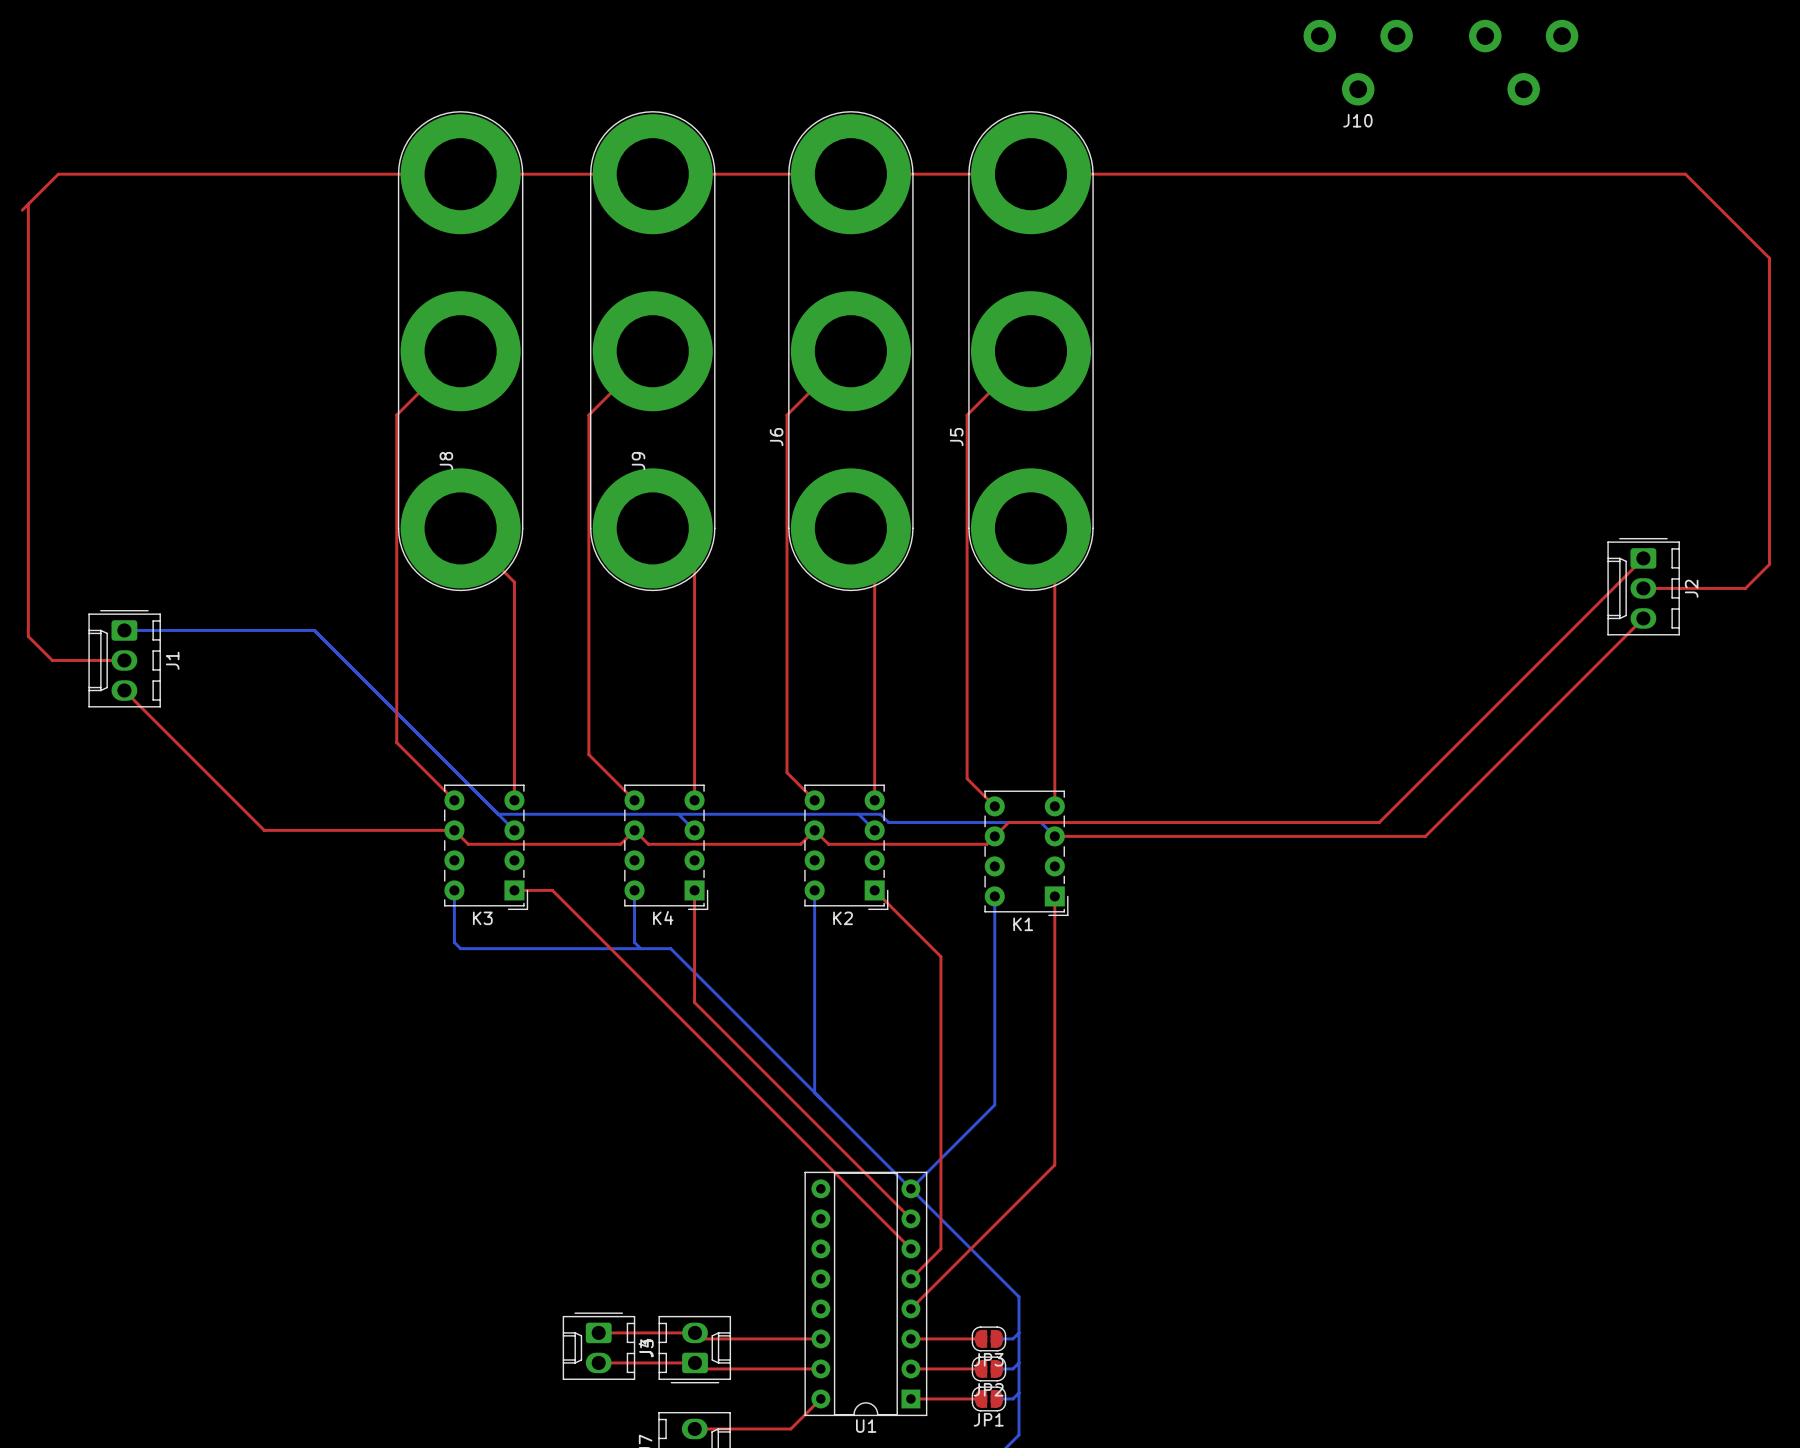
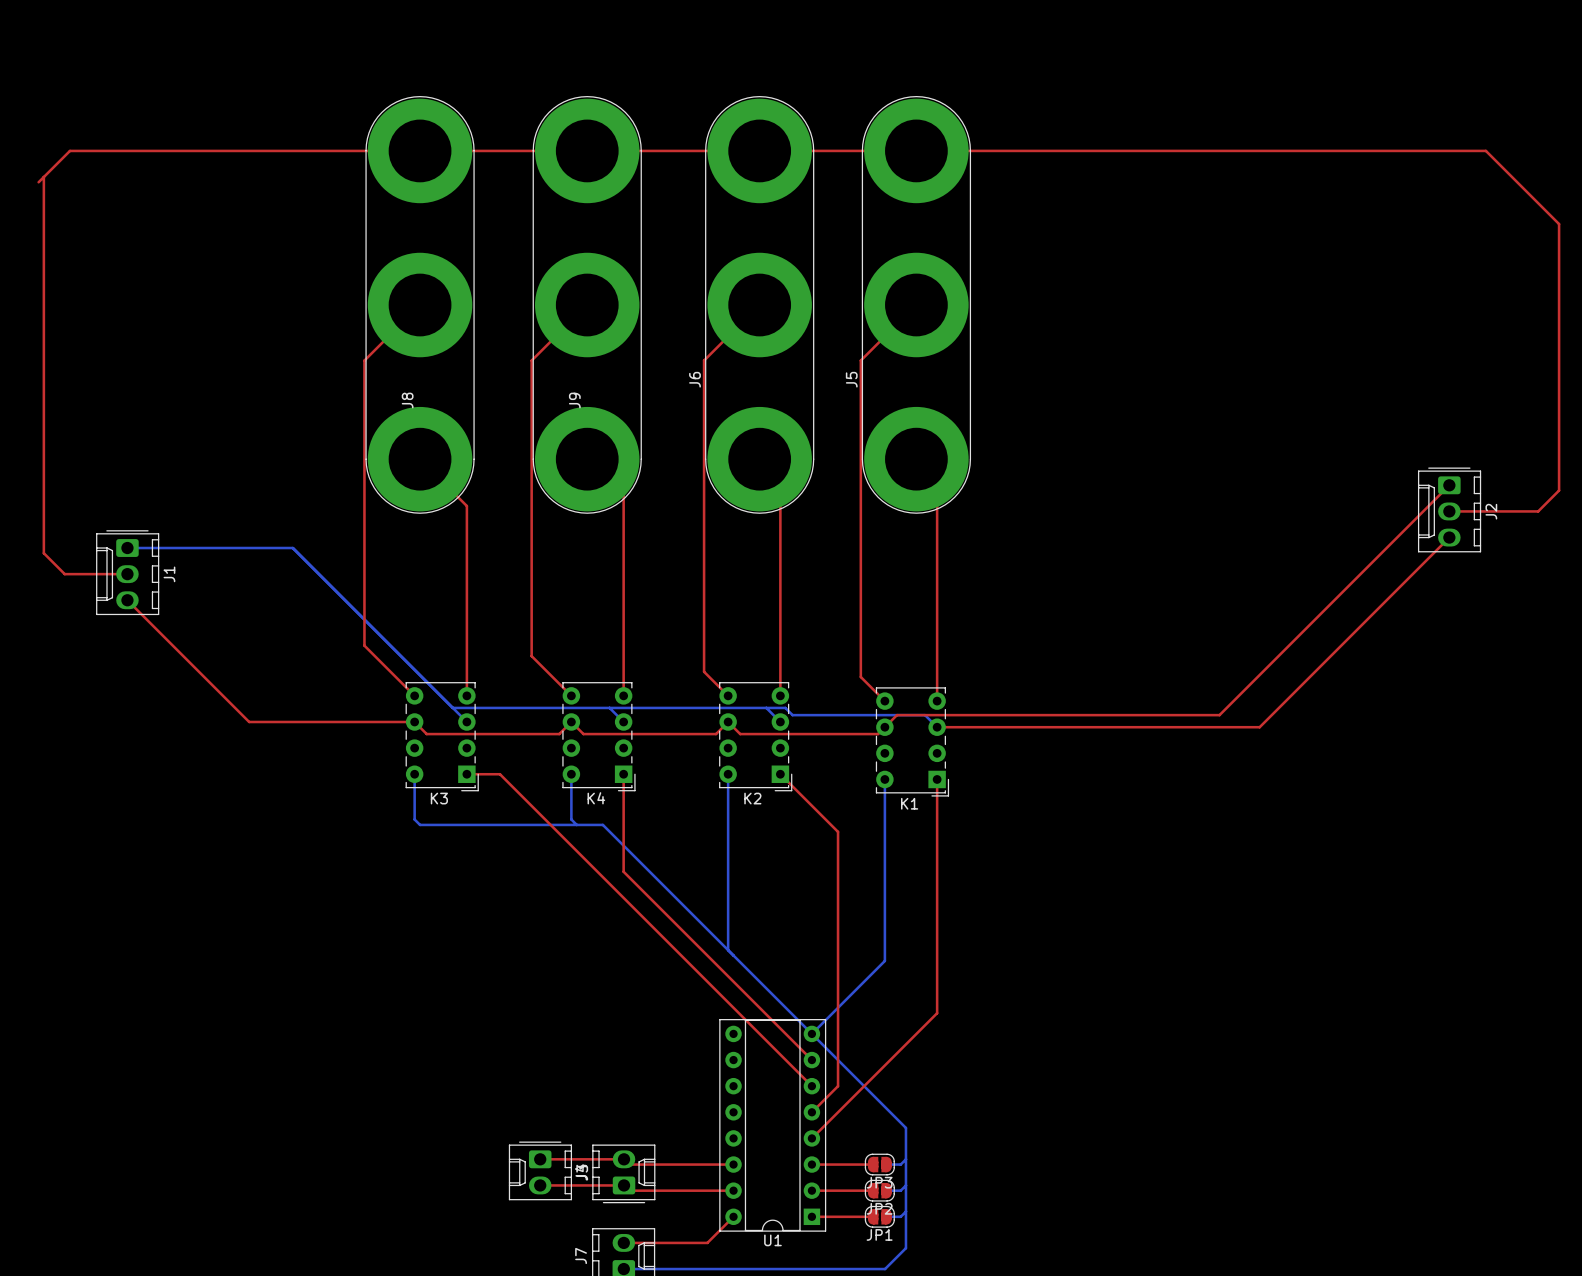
J10: (1440, 62) -> none

